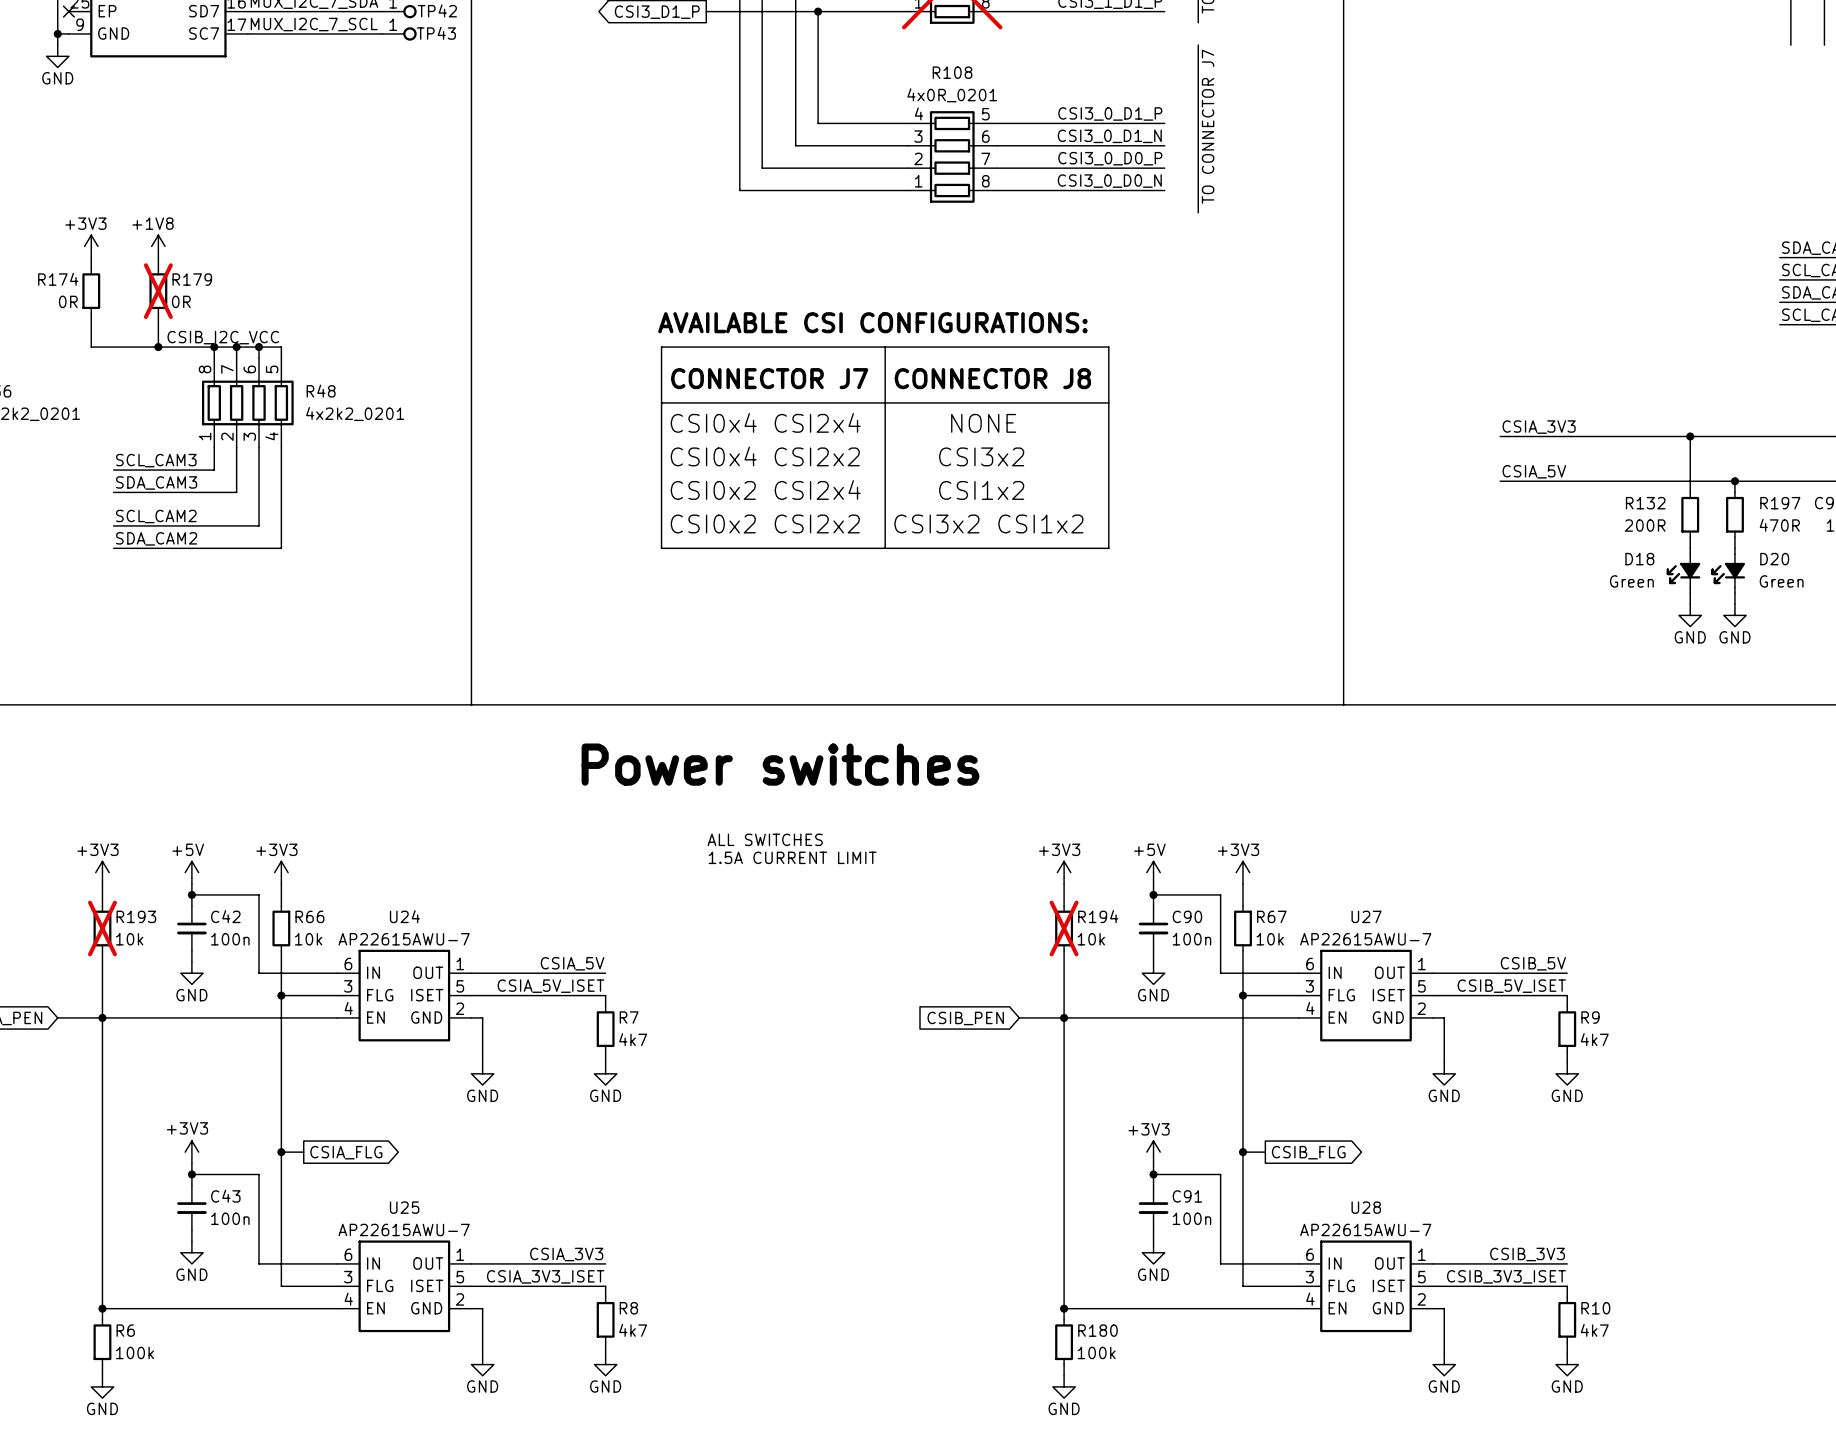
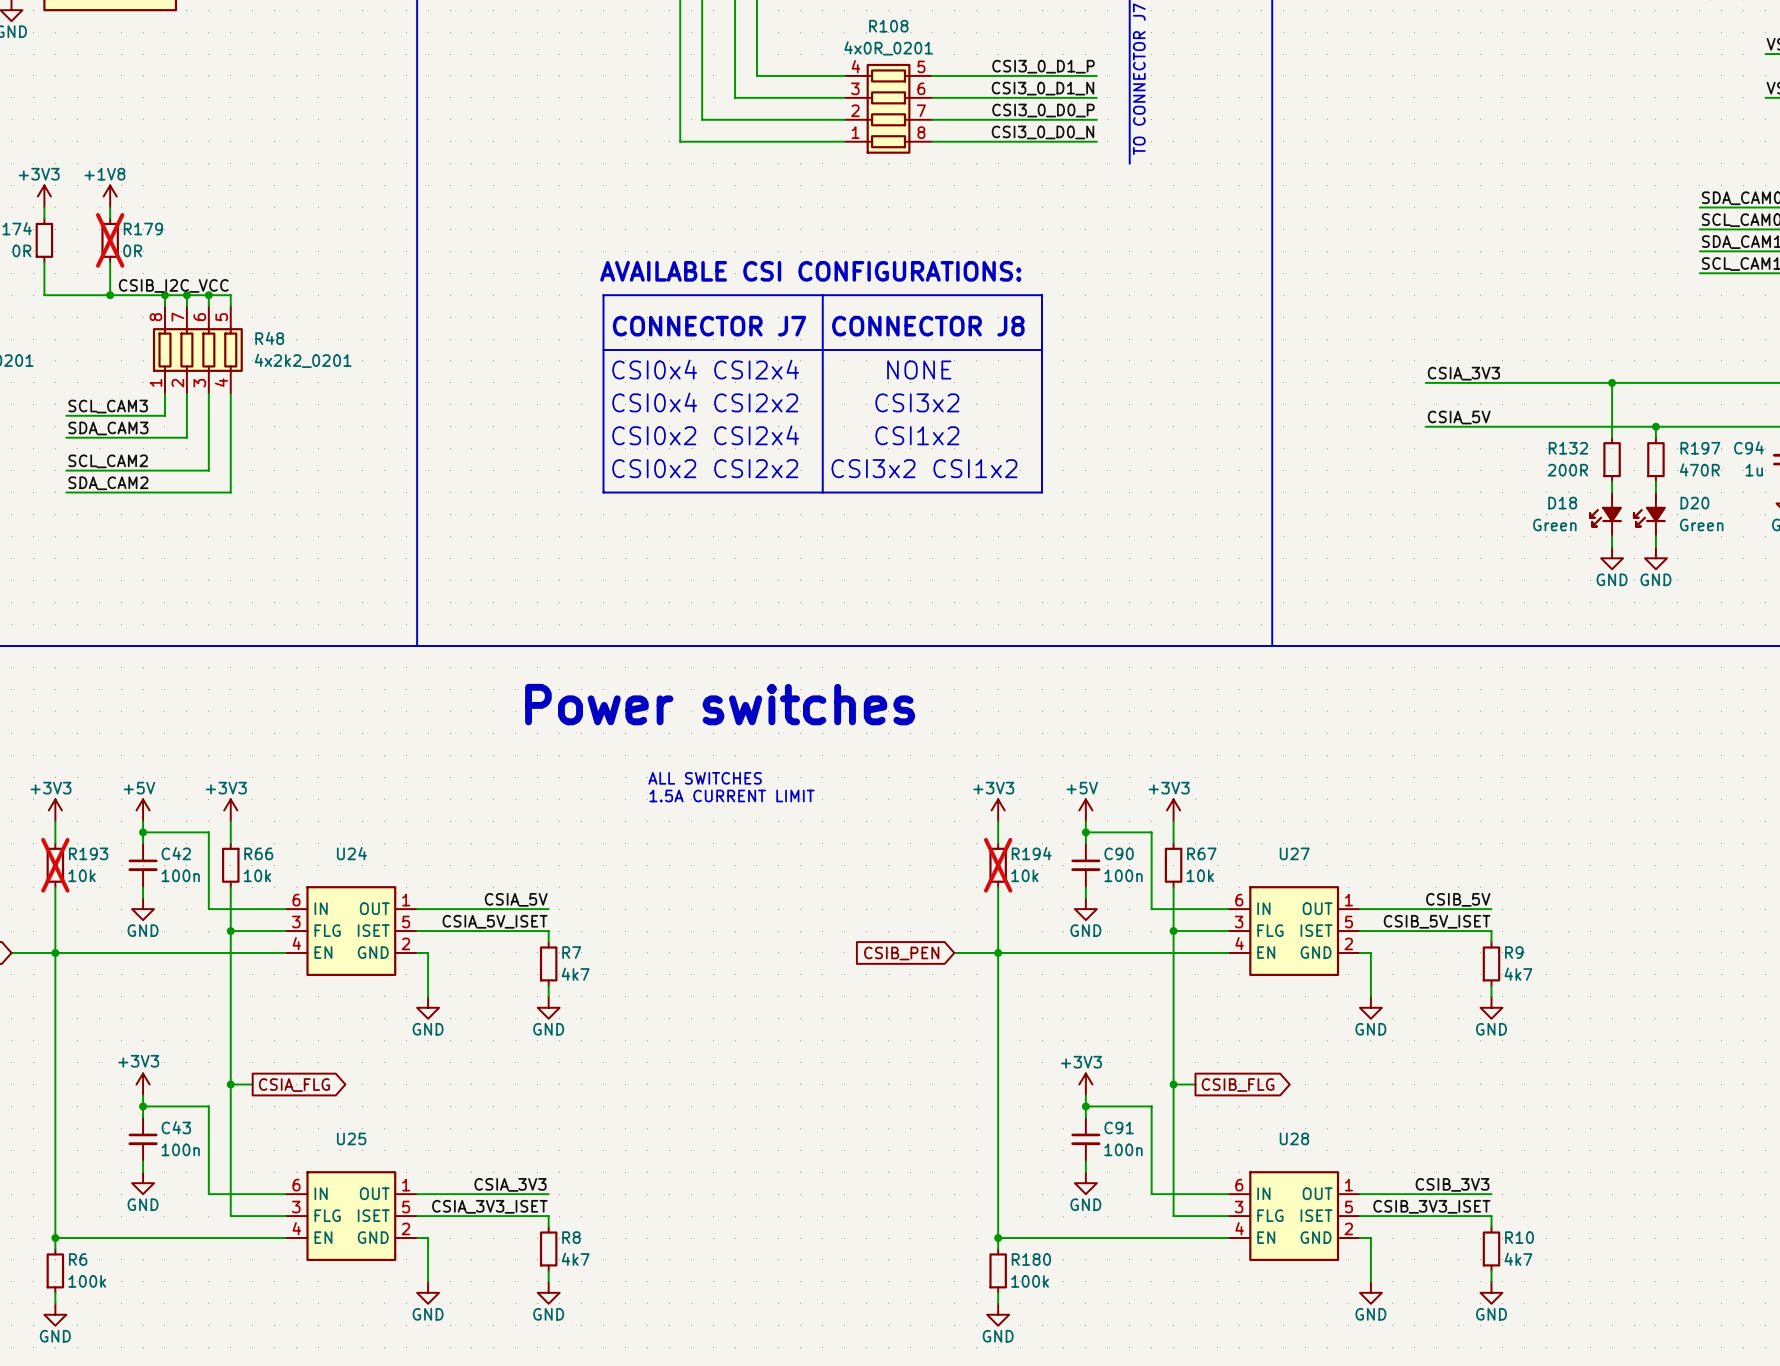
U24 text: AP22615AWU-7 (404, 939) -> none
U27 text: AP22615AWU-7 (1365, 939) -> none
U25 text: AP22615AWU-7 (404, 1229) -> none
U28 text: AP22615AWU-7 (1365, 1229) -> none

